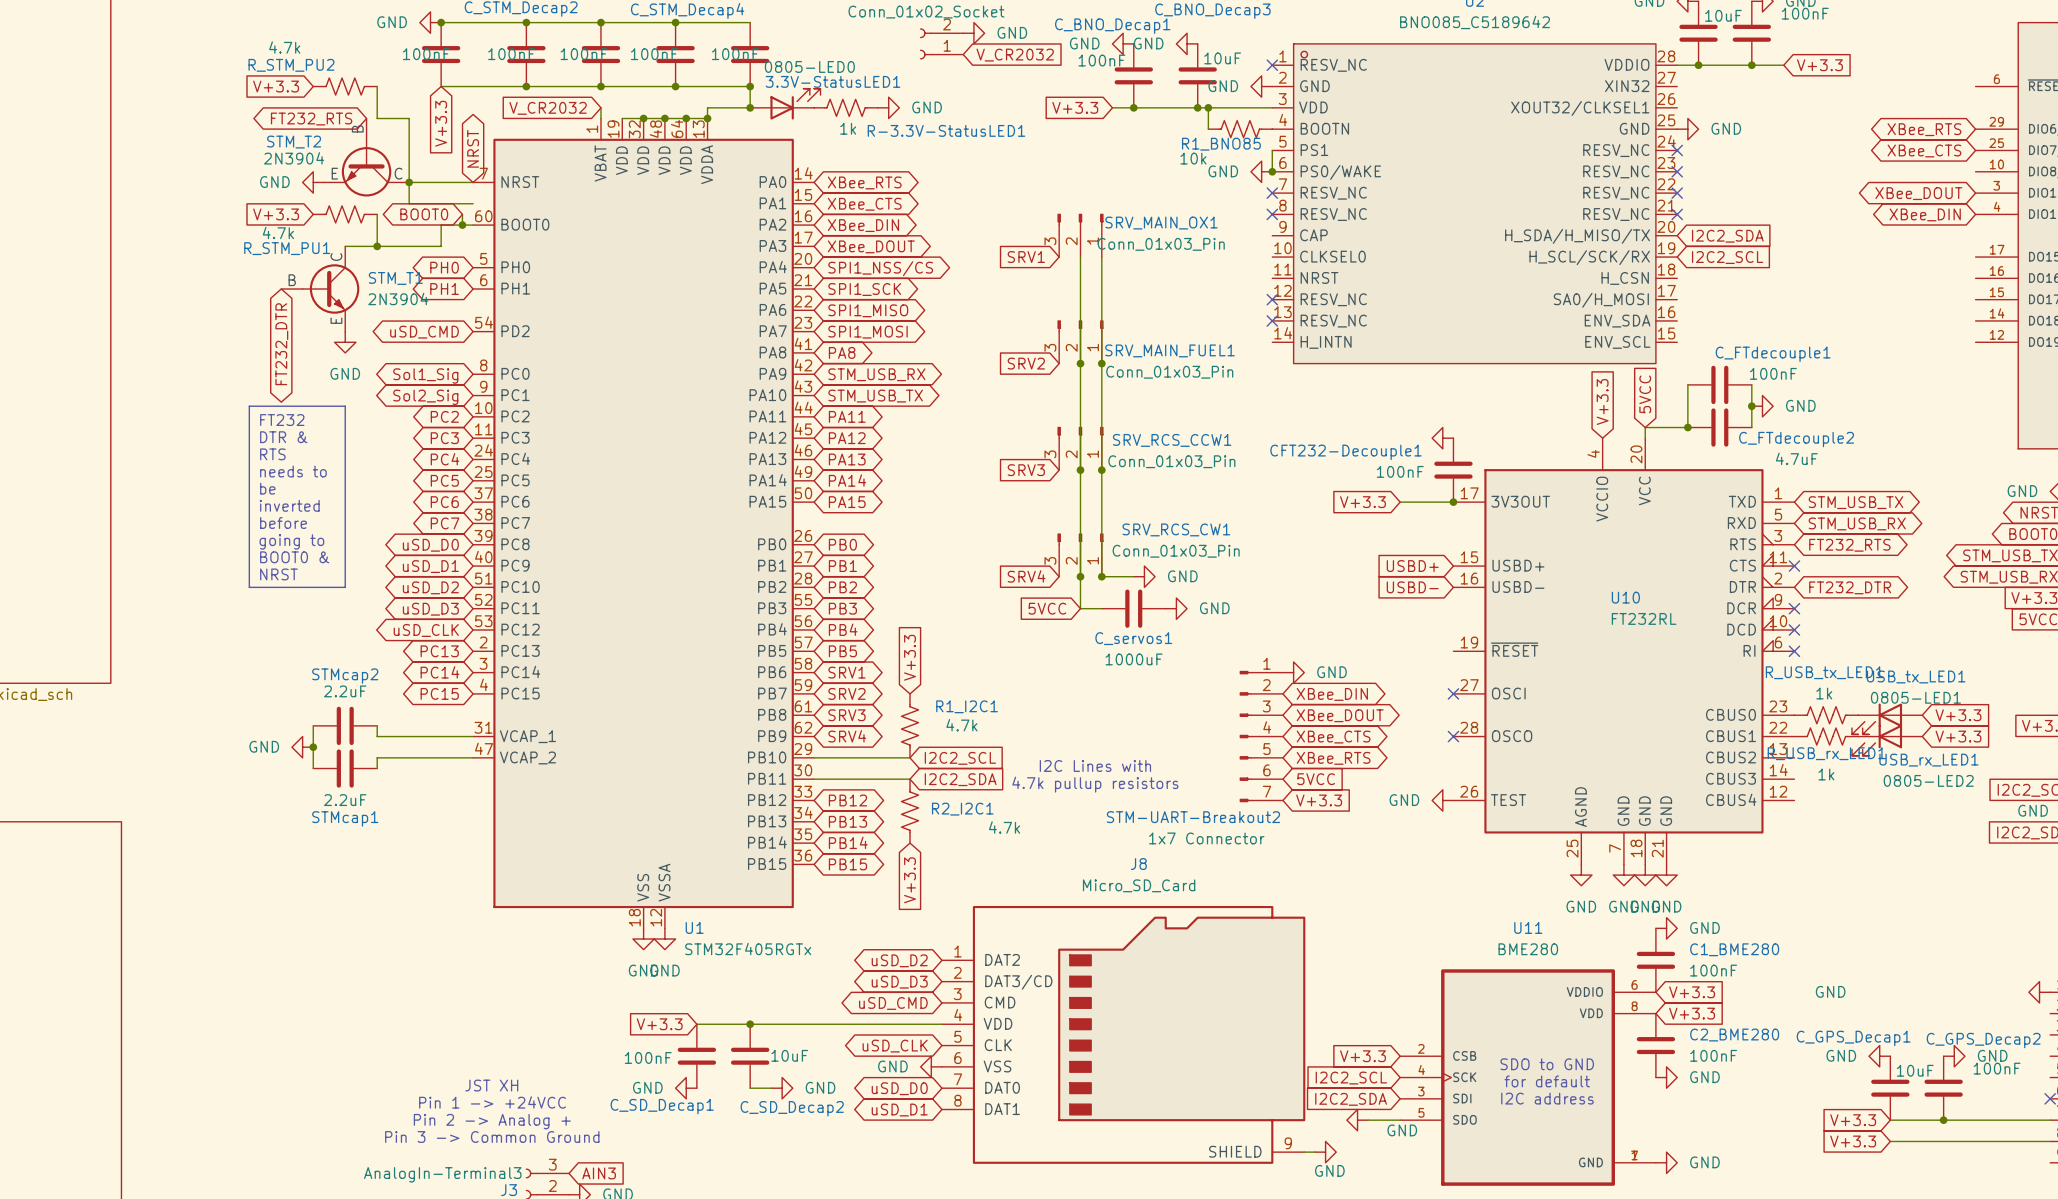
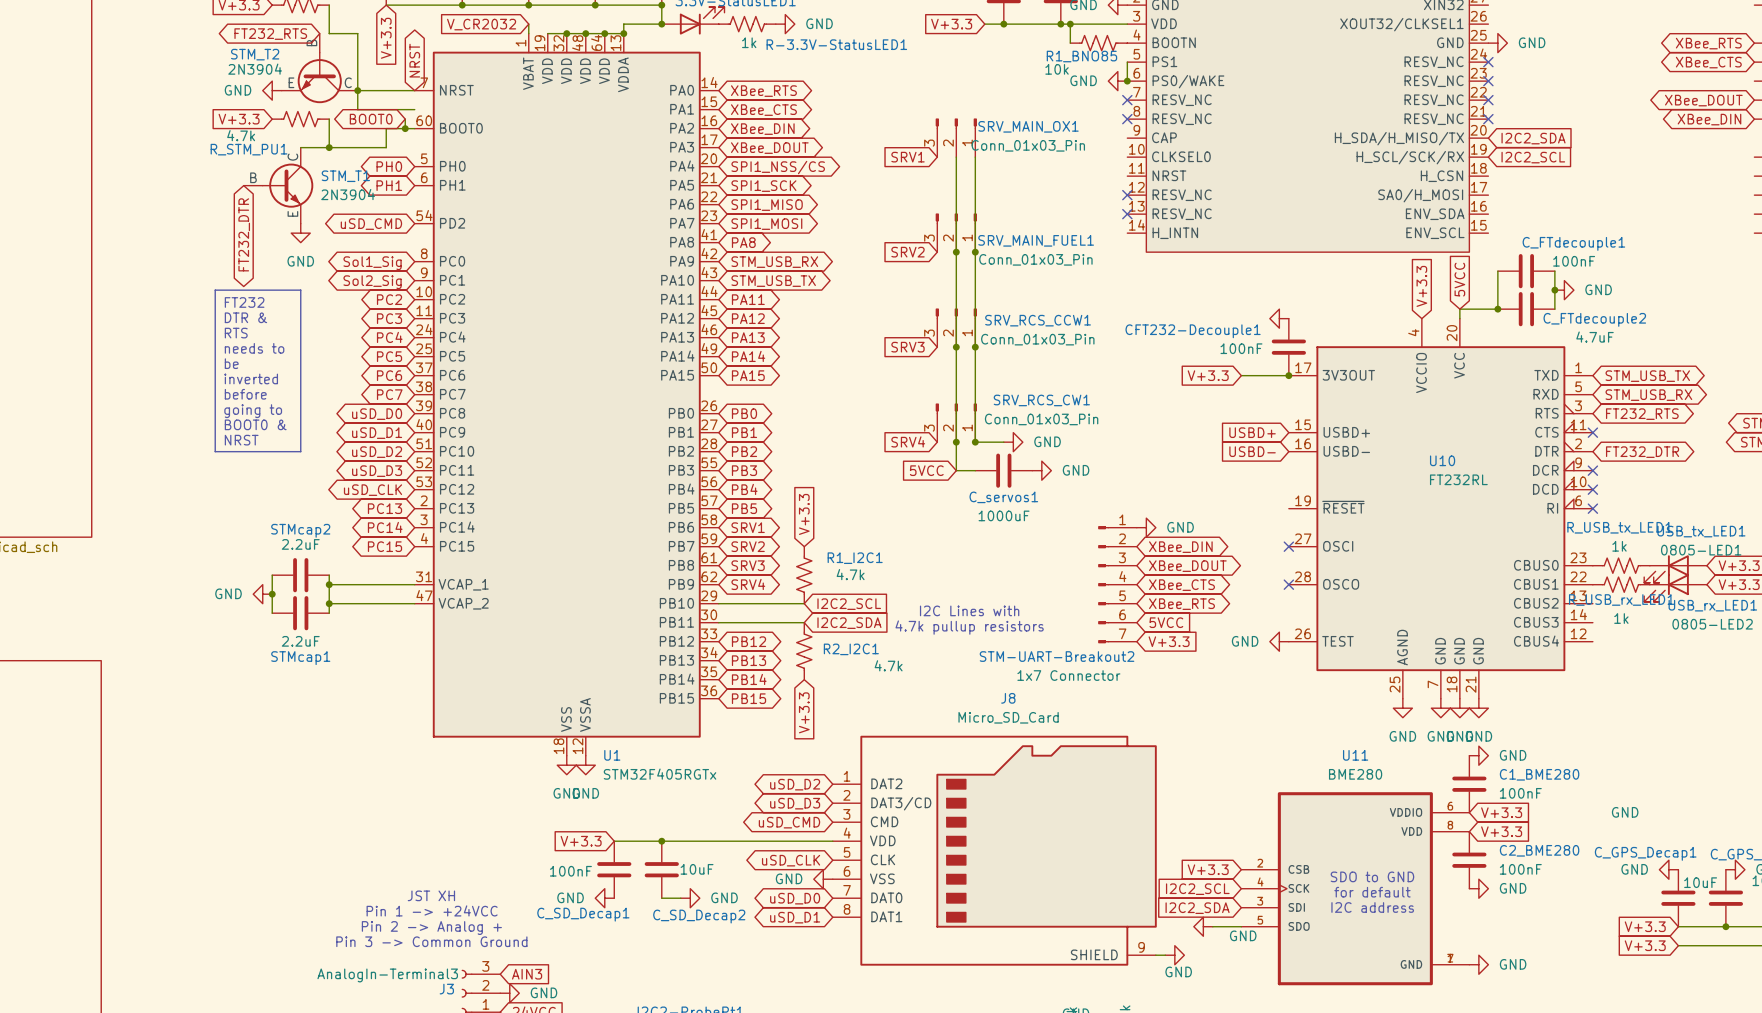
wire: none -> (329, 584) (329, 603)
junction: none -> (329, 584)
junction: none -> (329, 603)

